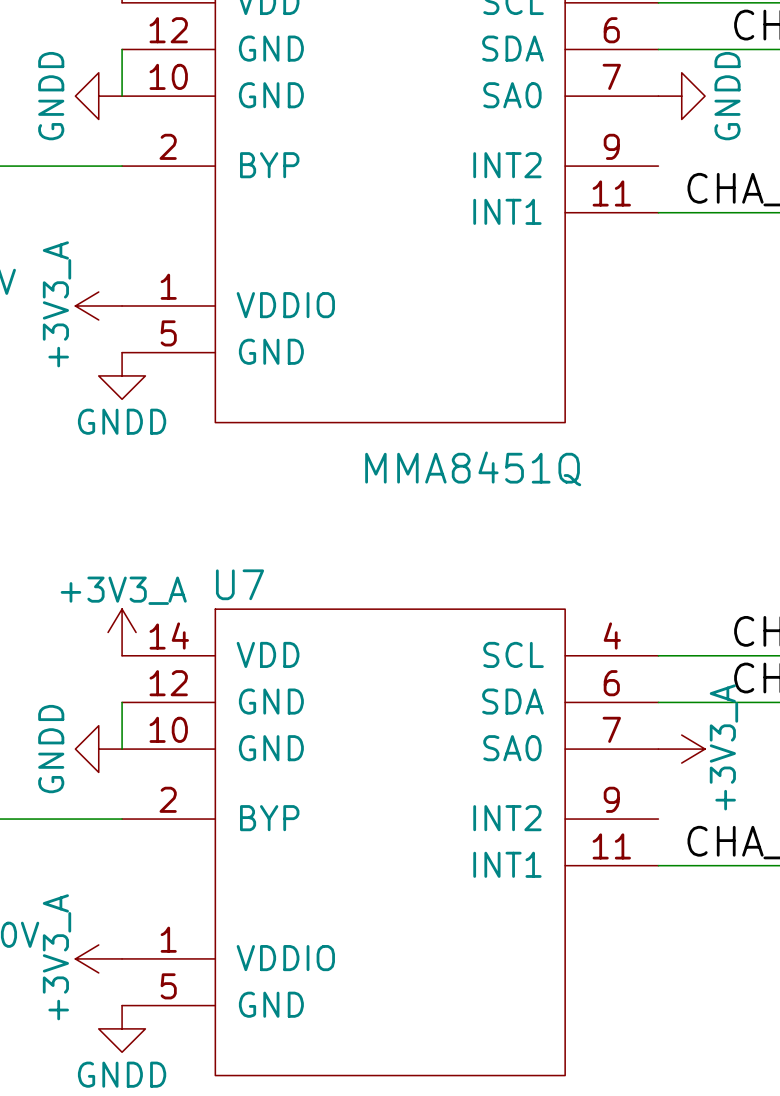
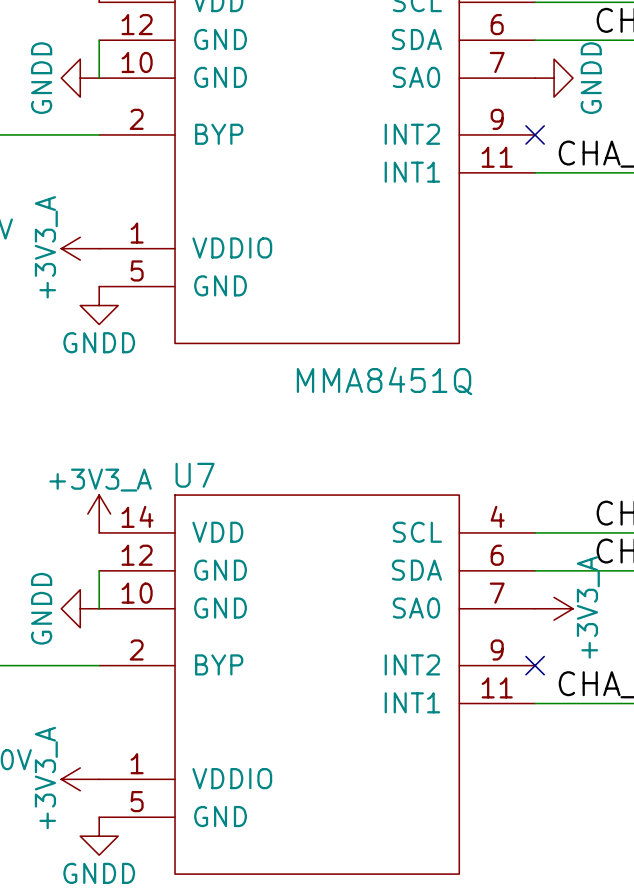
no-connect mark: none -> (535, 134)
no-connect mark: none -> (535, 665)

